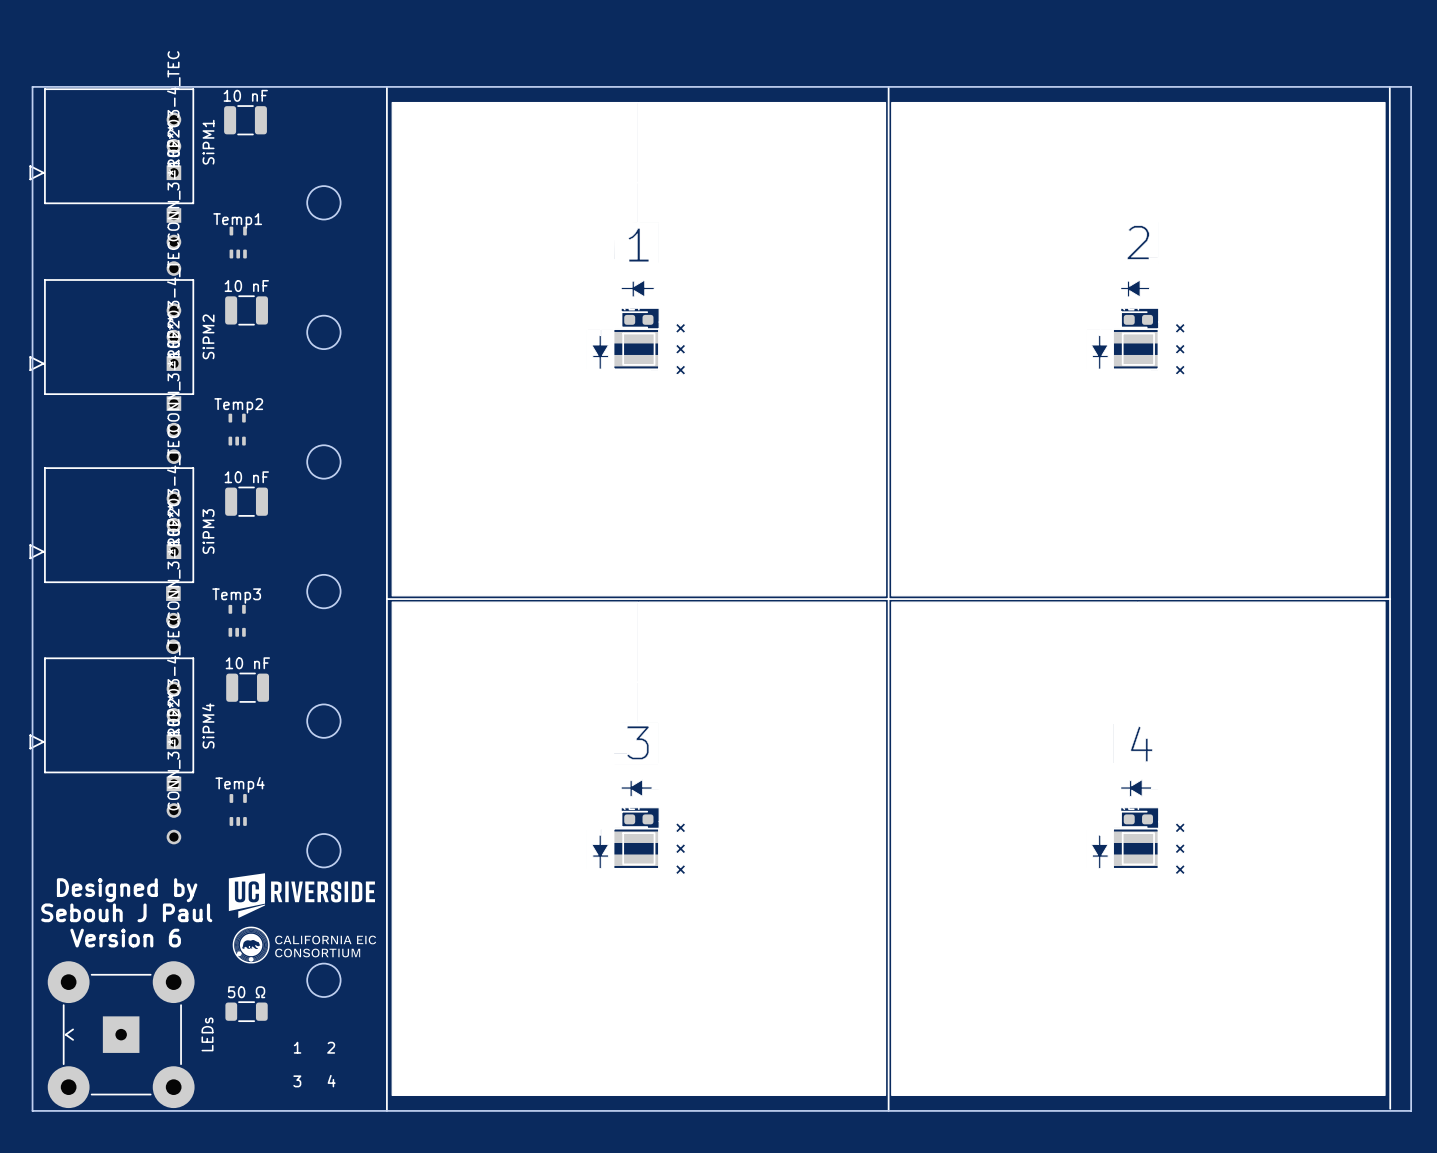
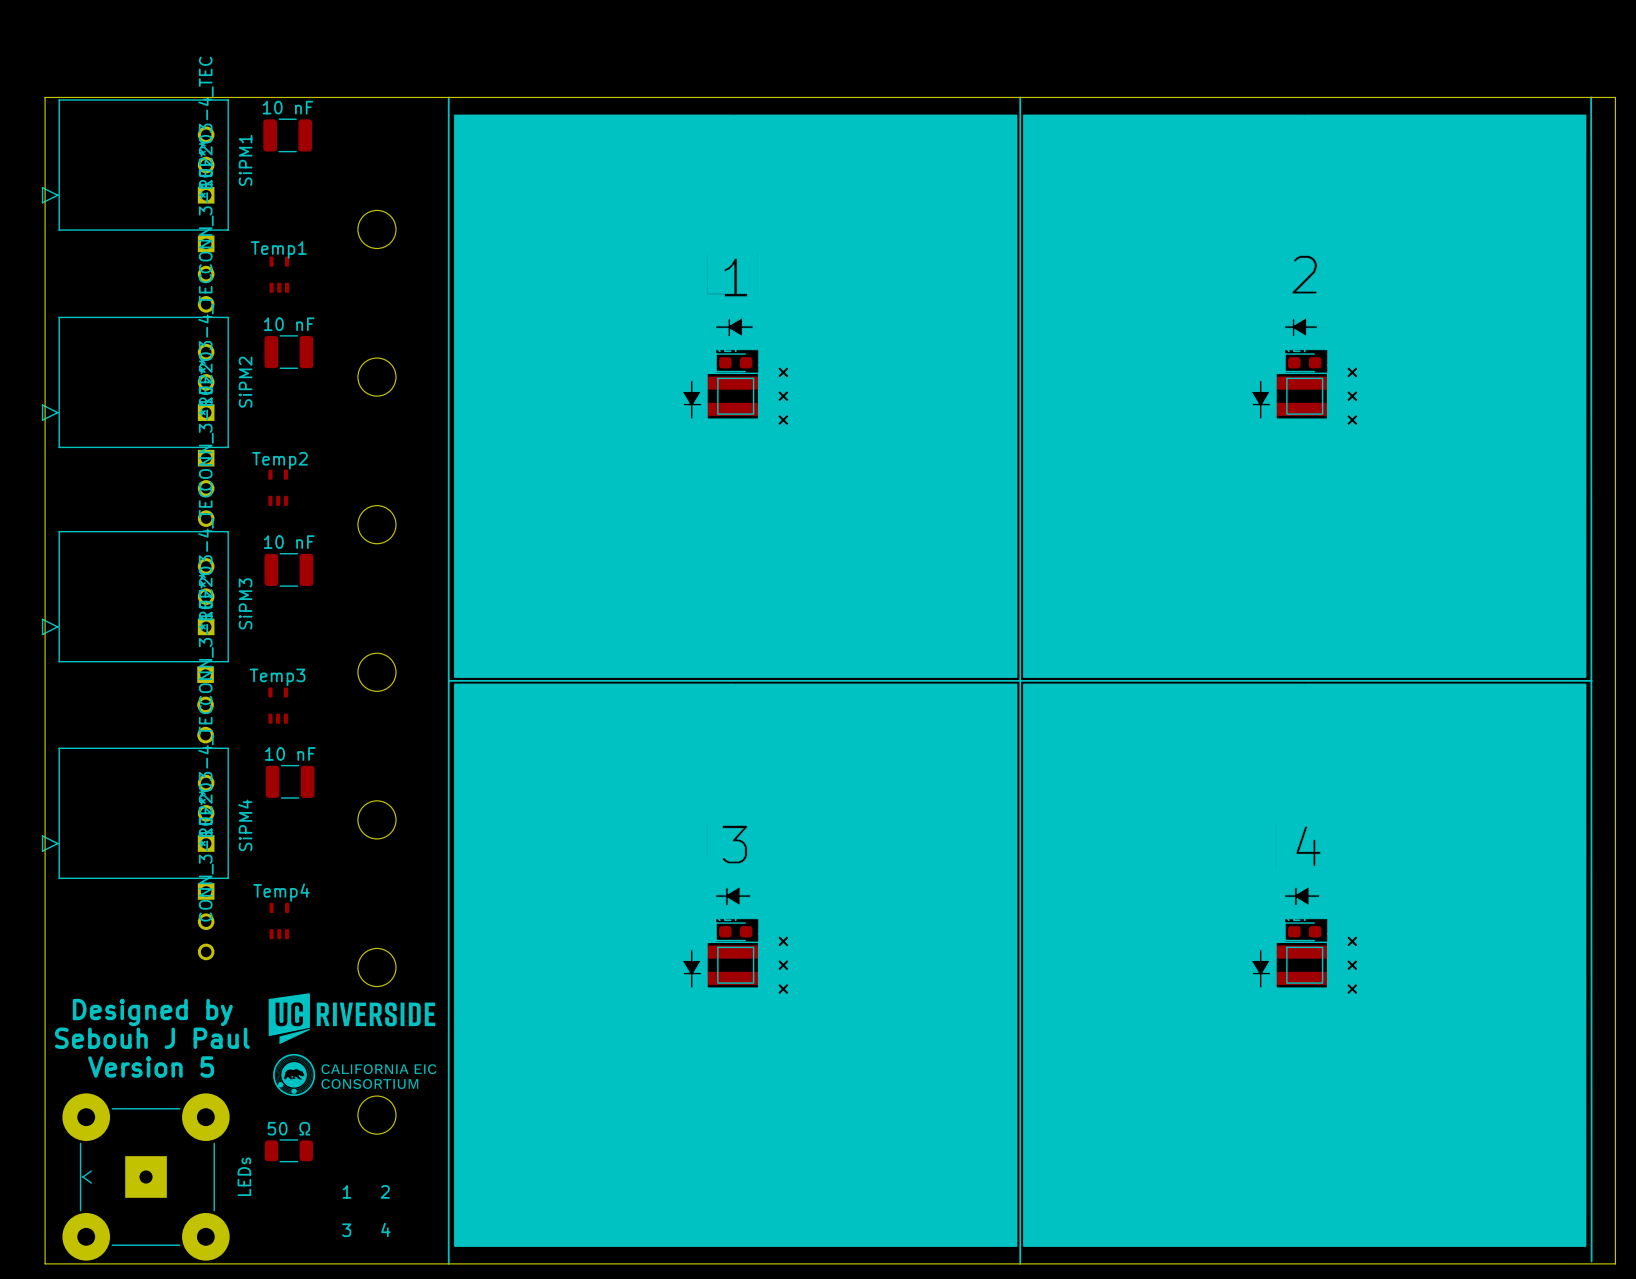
text: Version 6 (125, 938) -> Version 5 (151, 1066)

